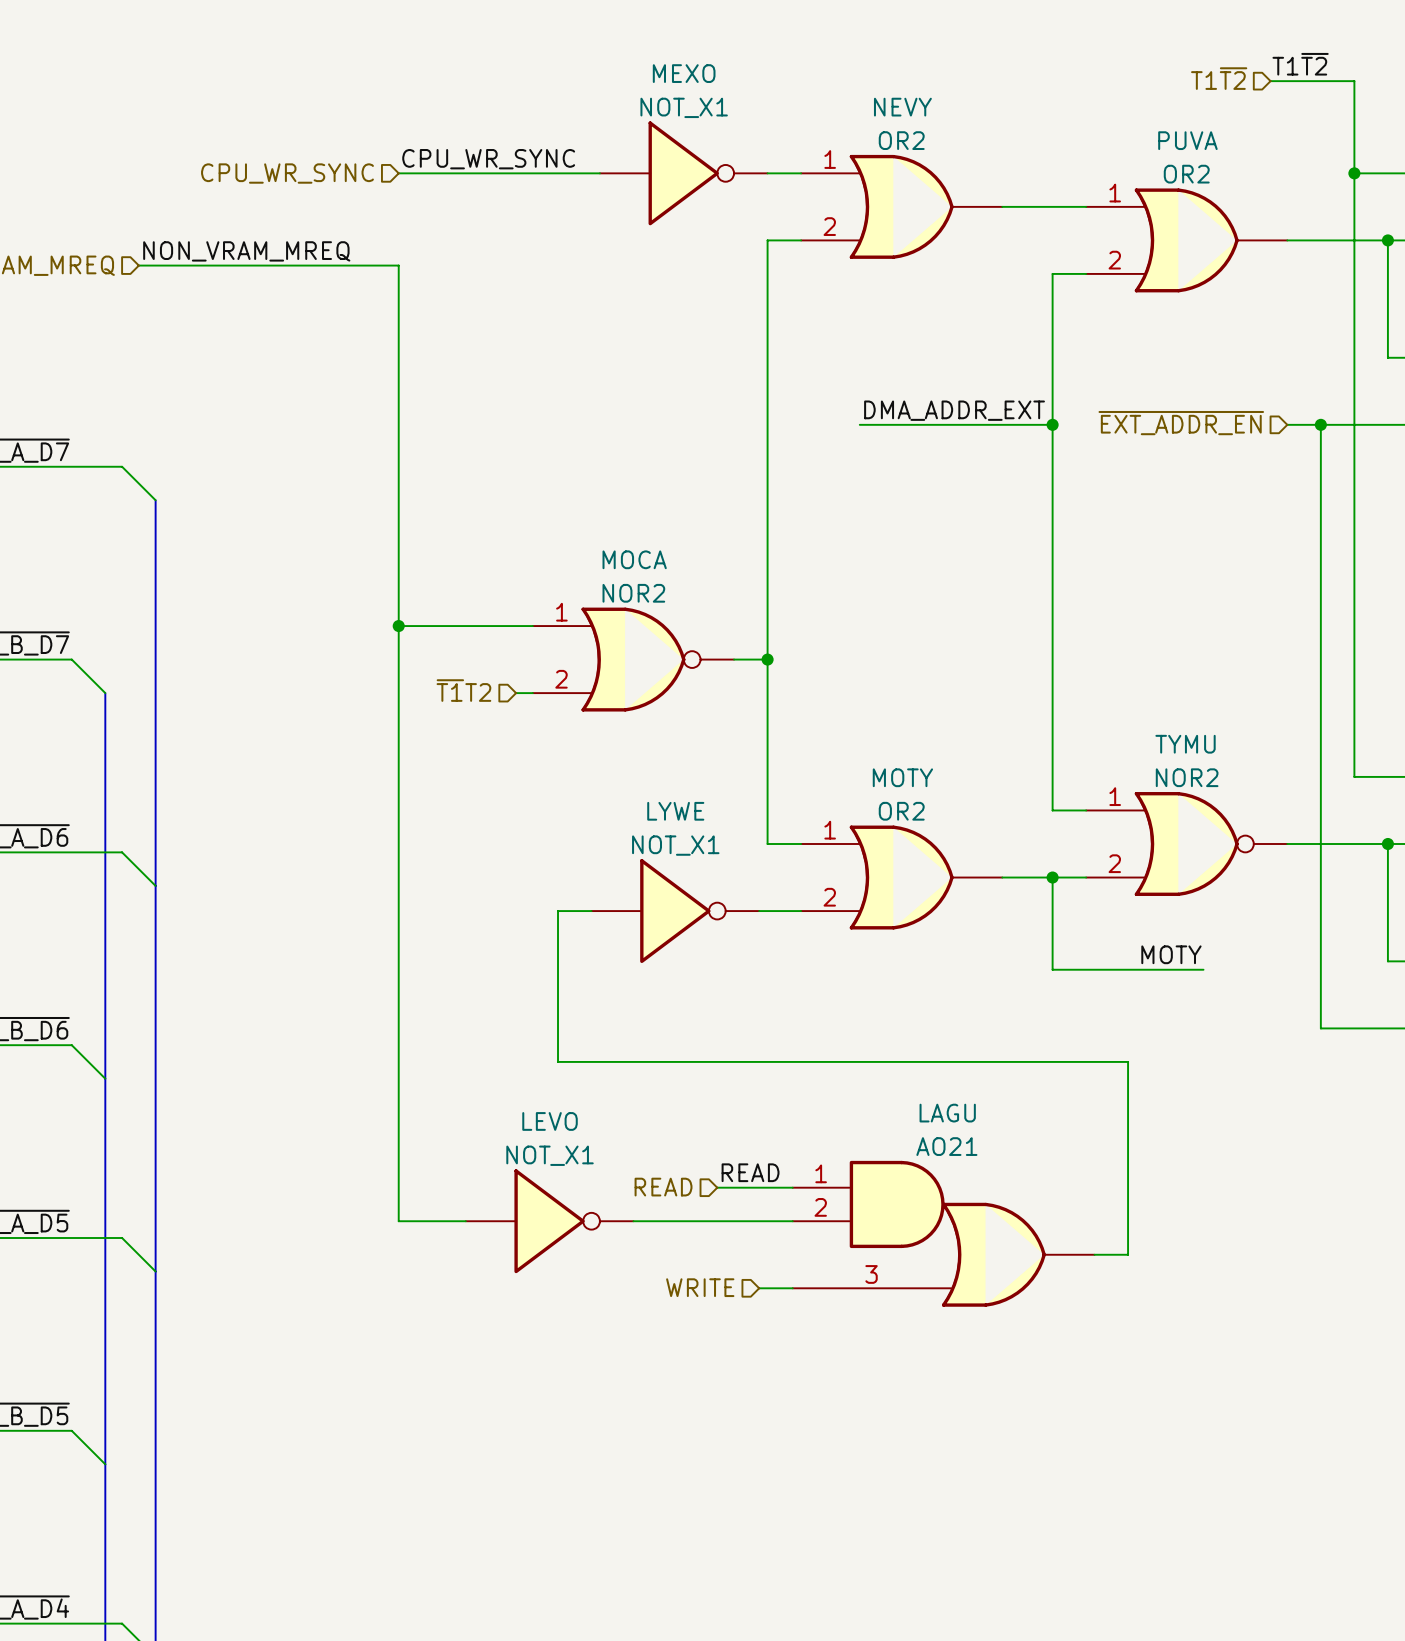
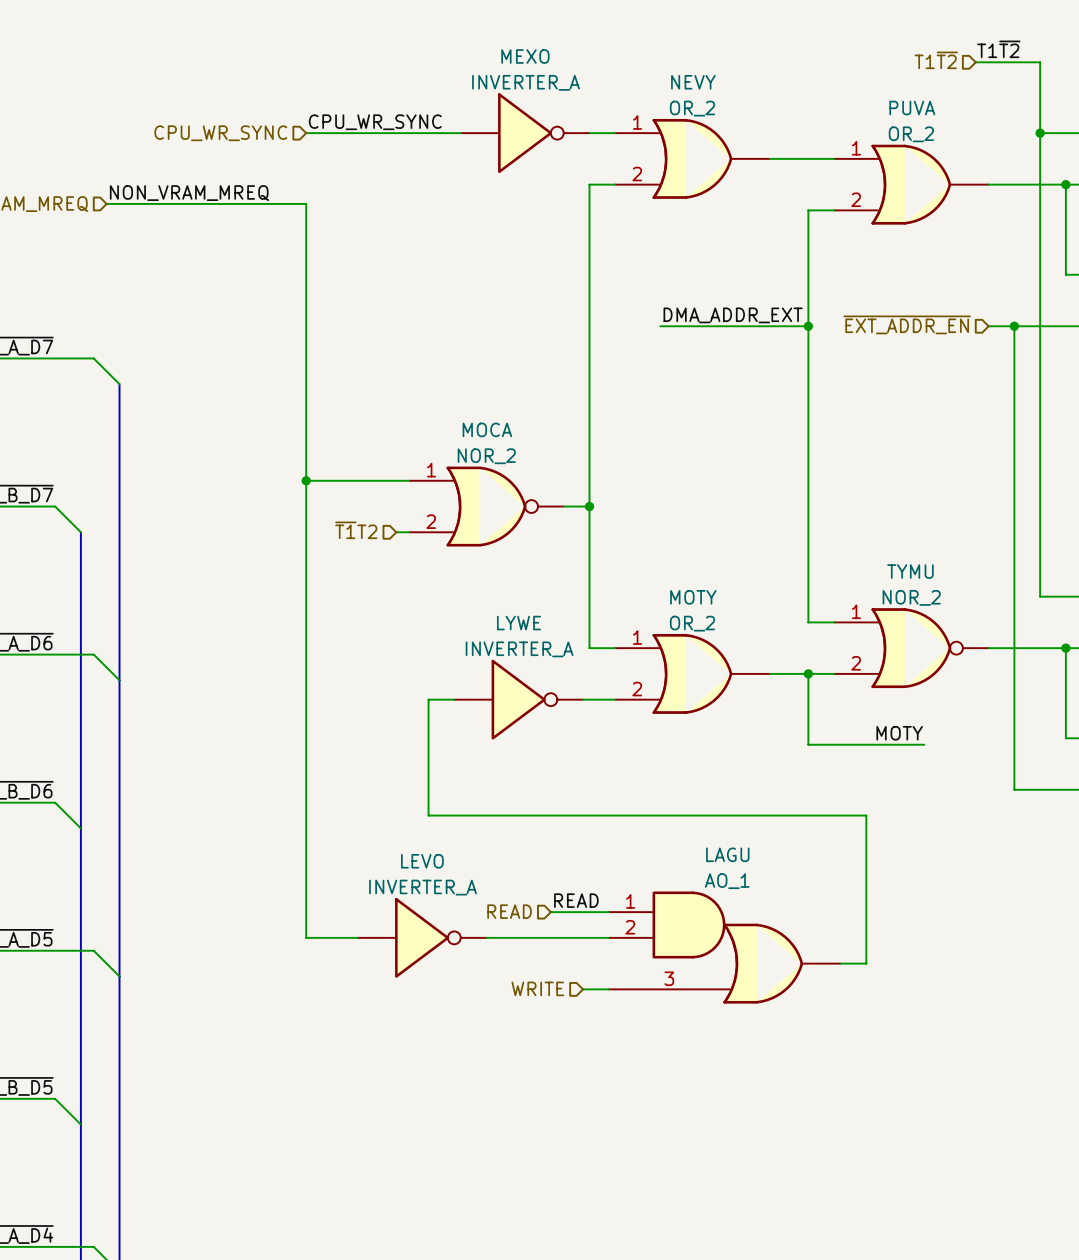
MEXO value: NOT_X1 (684, 107) -> INVERTER_A (526, 82)
NEVY value: OR2 (901, 140) -> OR_2 (692, 108)
PUVA value: OR2 (1186, 174) -> OR_2 (911, 134)
MOCA value: NOR2 (633, 593) -> NOR_2 (486, 456)
TYMU value: NOR2 (1187, 777) -> NOR_2 (911, 597)
MOTY value: OR2 (901, 811) -> OR_2 (692, 623)
LYWE value: NOT_X1 (675, 845) -> INVERTER_A (519, 649)
LAGU value: AO21 (946, 1146) -> AO_1 (727, 881)
LEVO value: NOT_X1 (550, 1155) -> INVERTER_A (423, 887)

